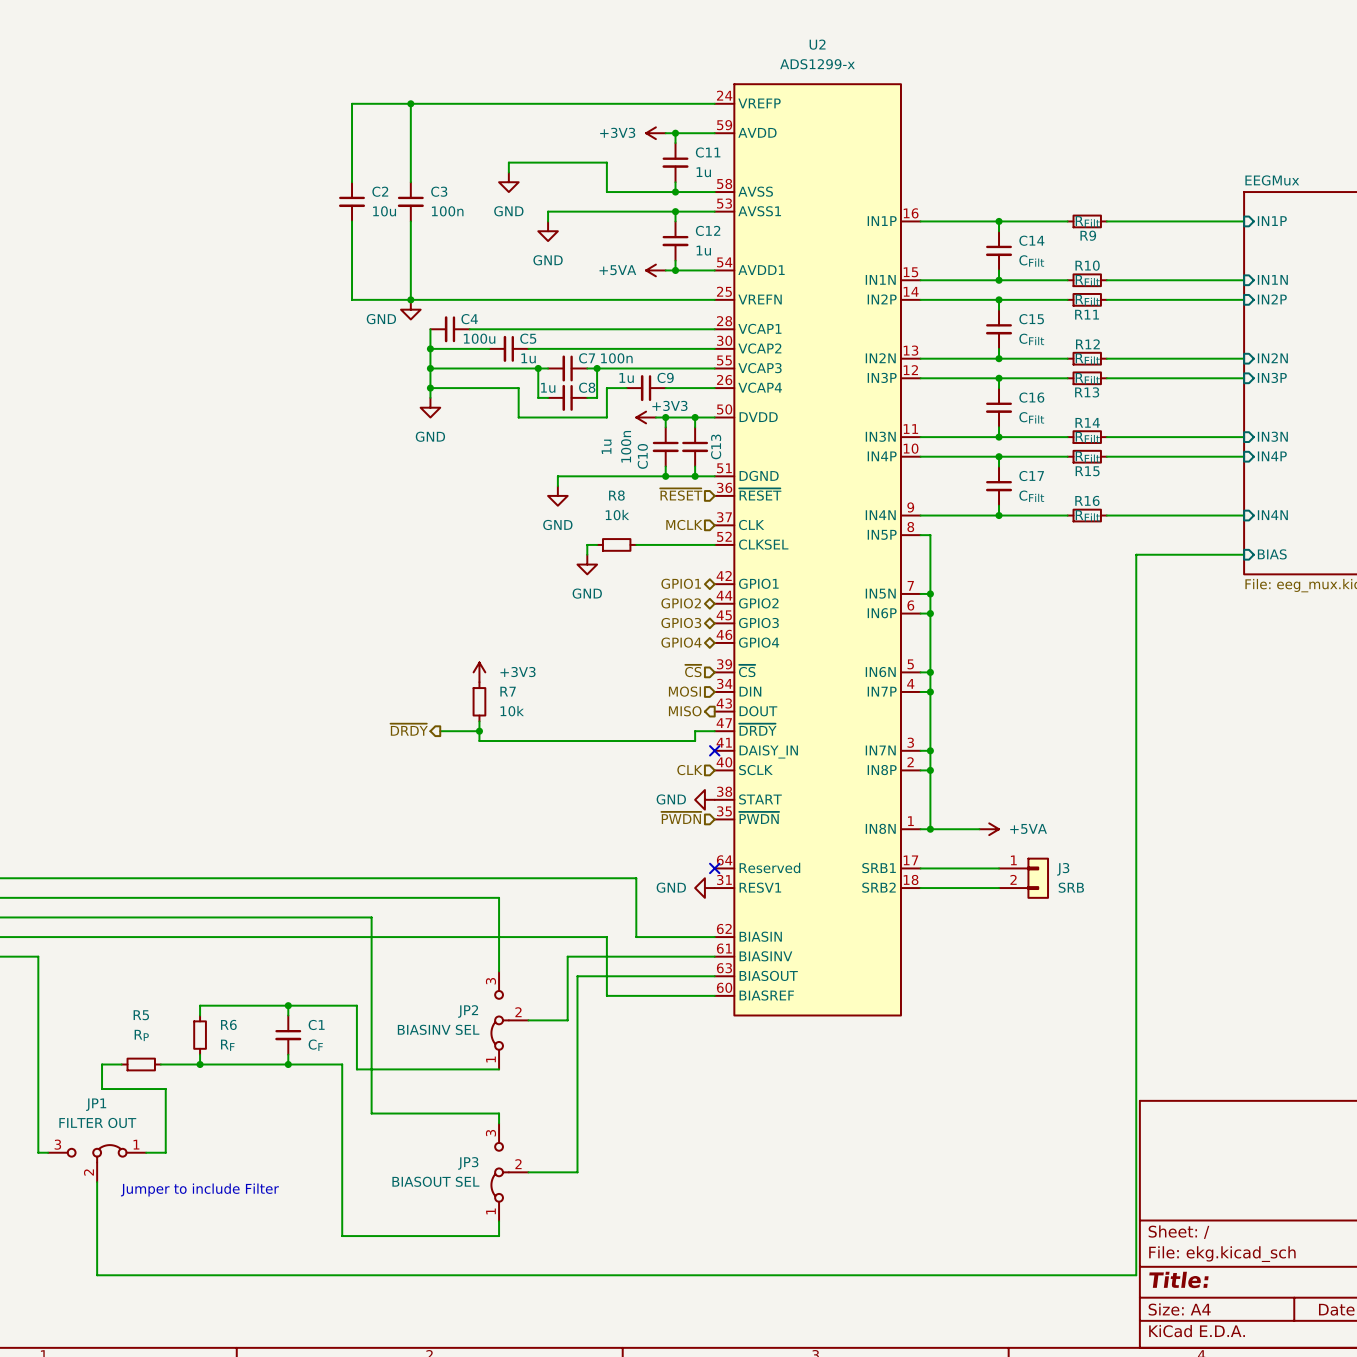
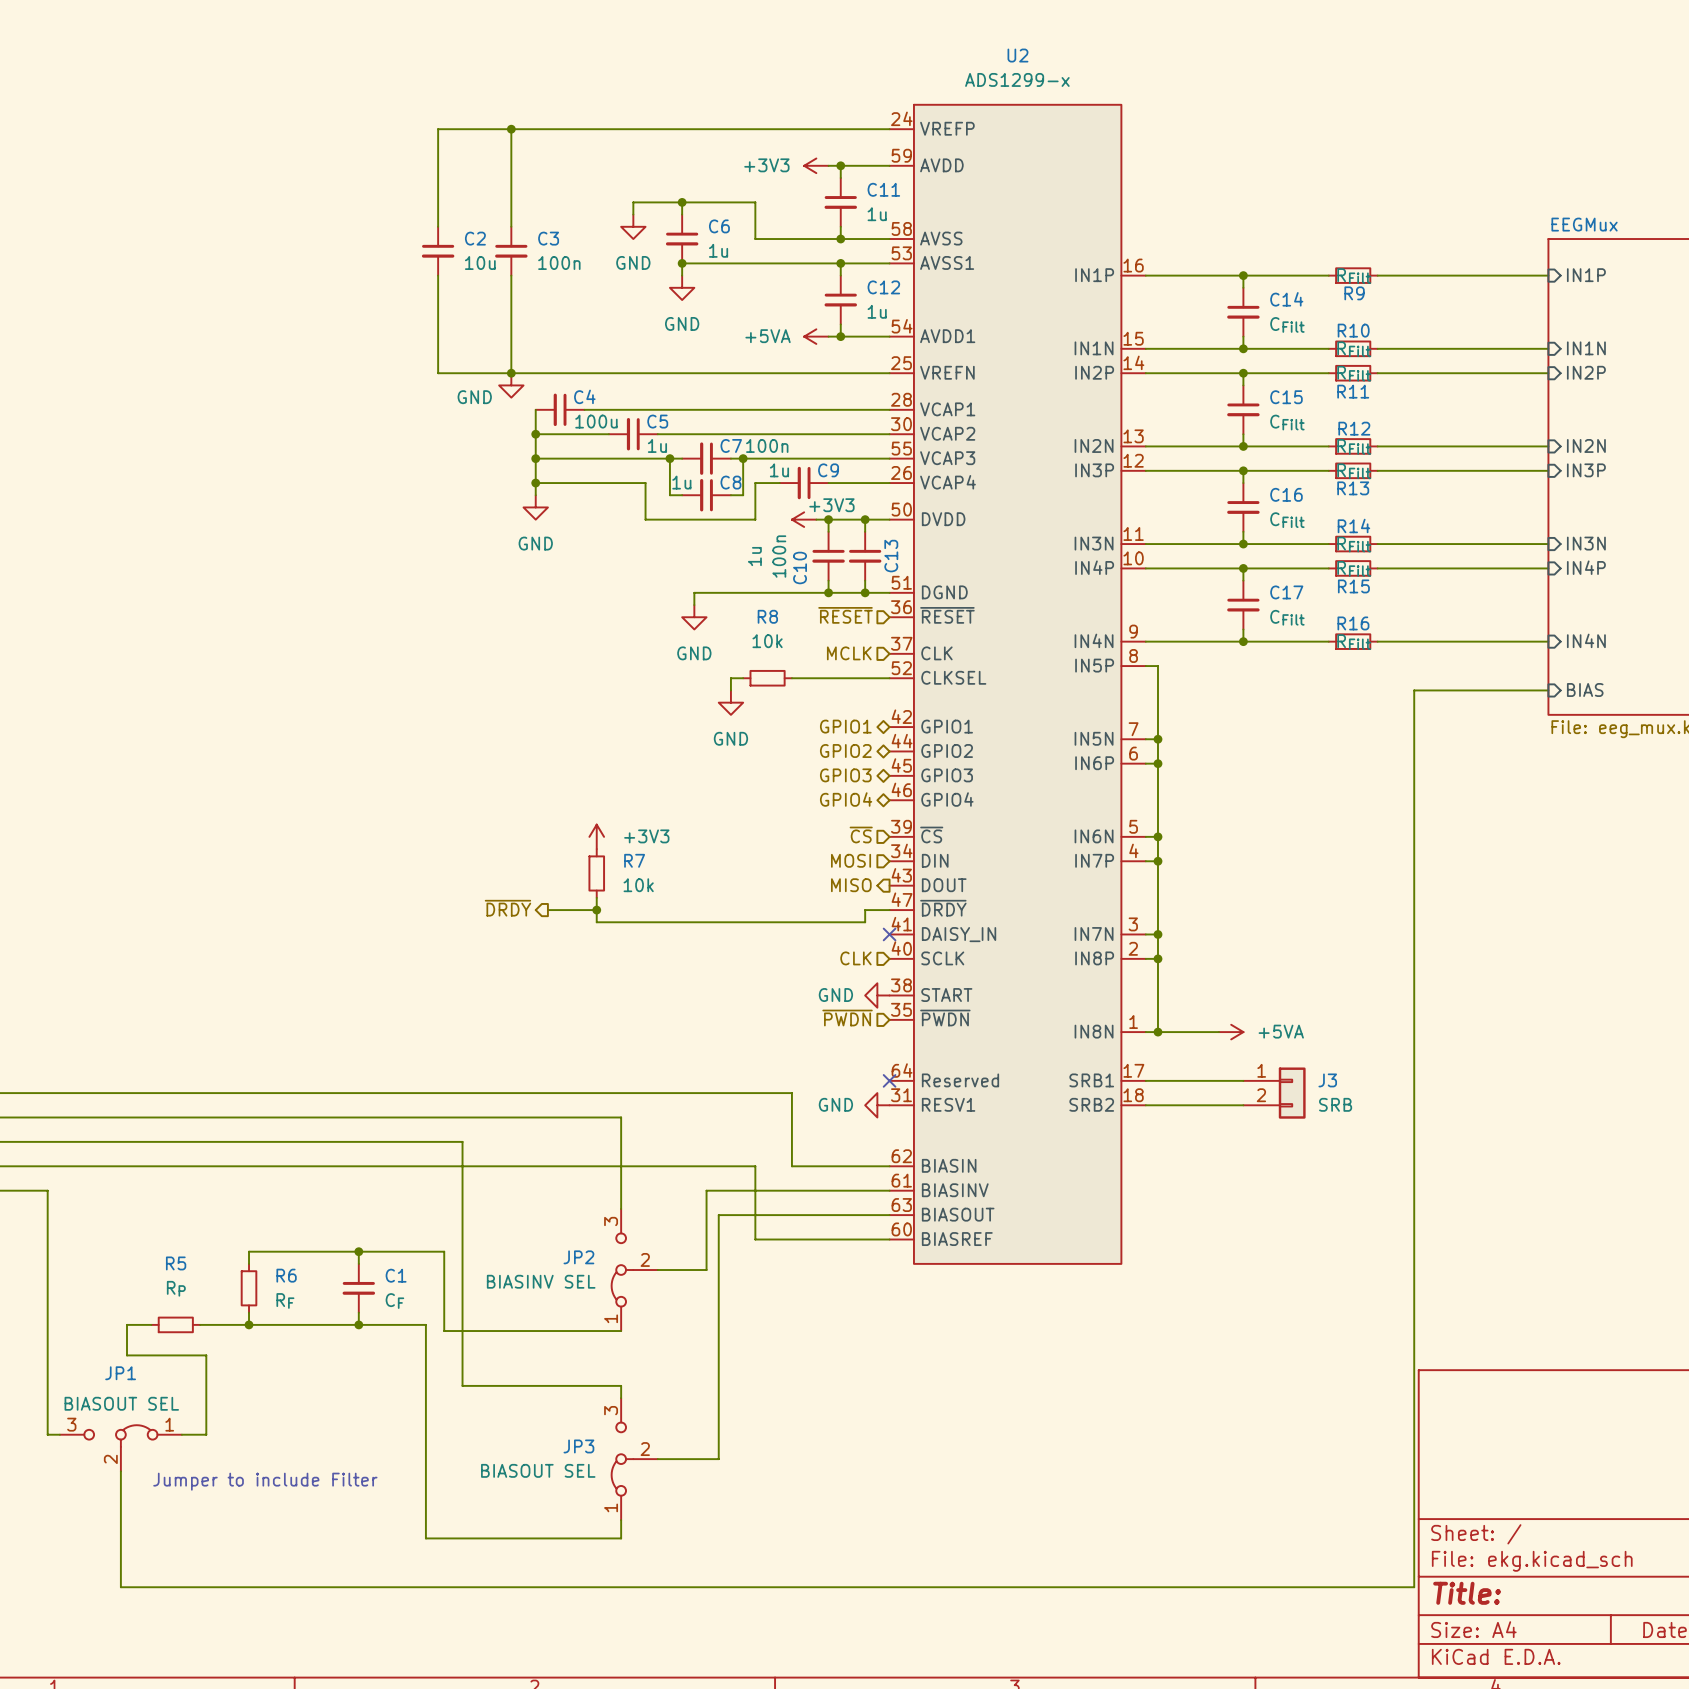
wire: none -> (682, 202) (682, 214)
junction: none -> (682, 202)
C6: none -> 1u (682, 239)
junction: none -> (682, 263)
JP1 value: FILTER OUT (97, 1122) -> BIASOUT SEL (121, 1403)

